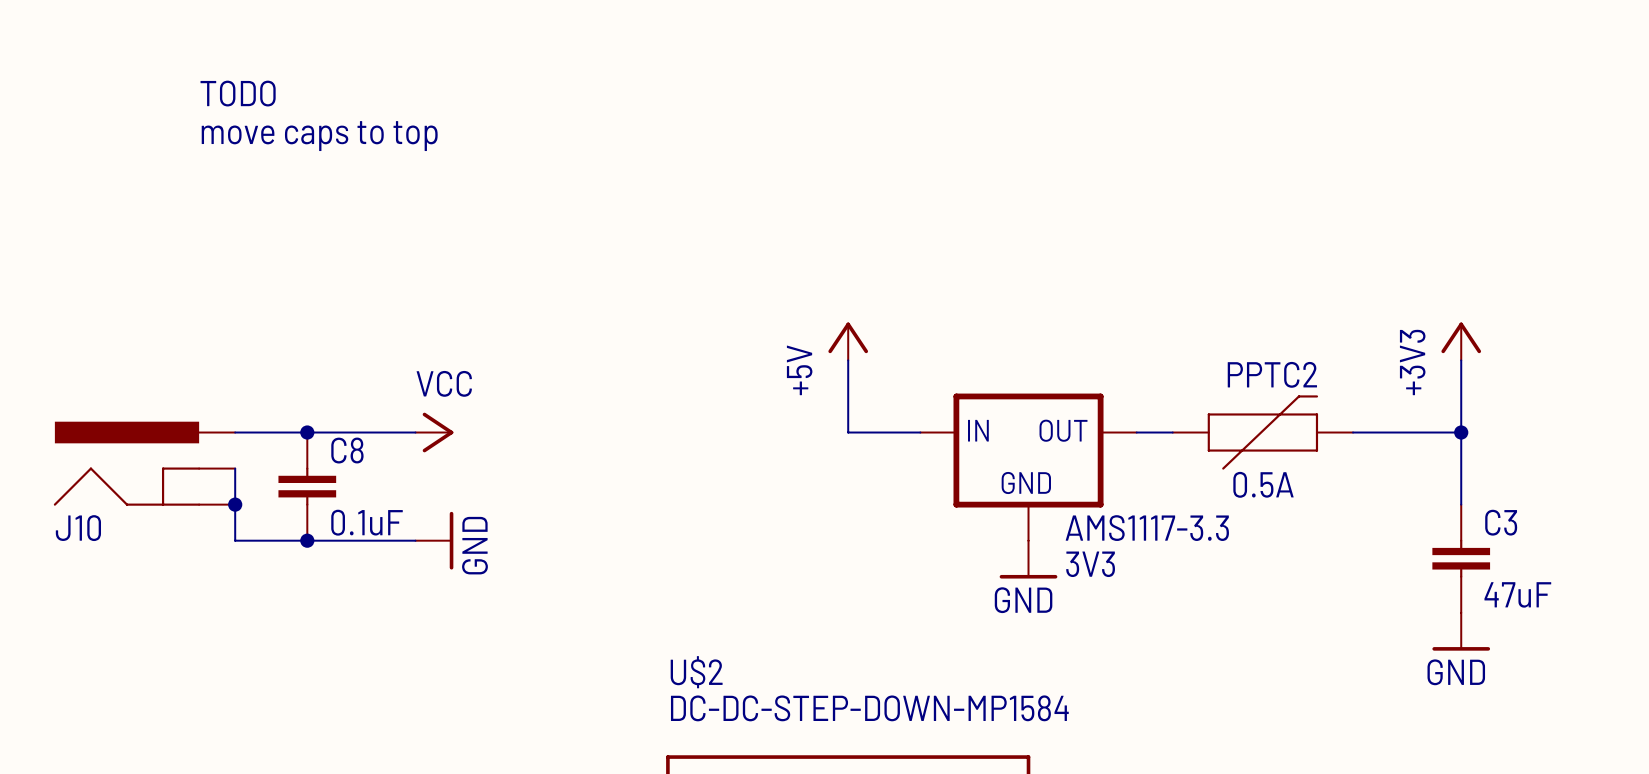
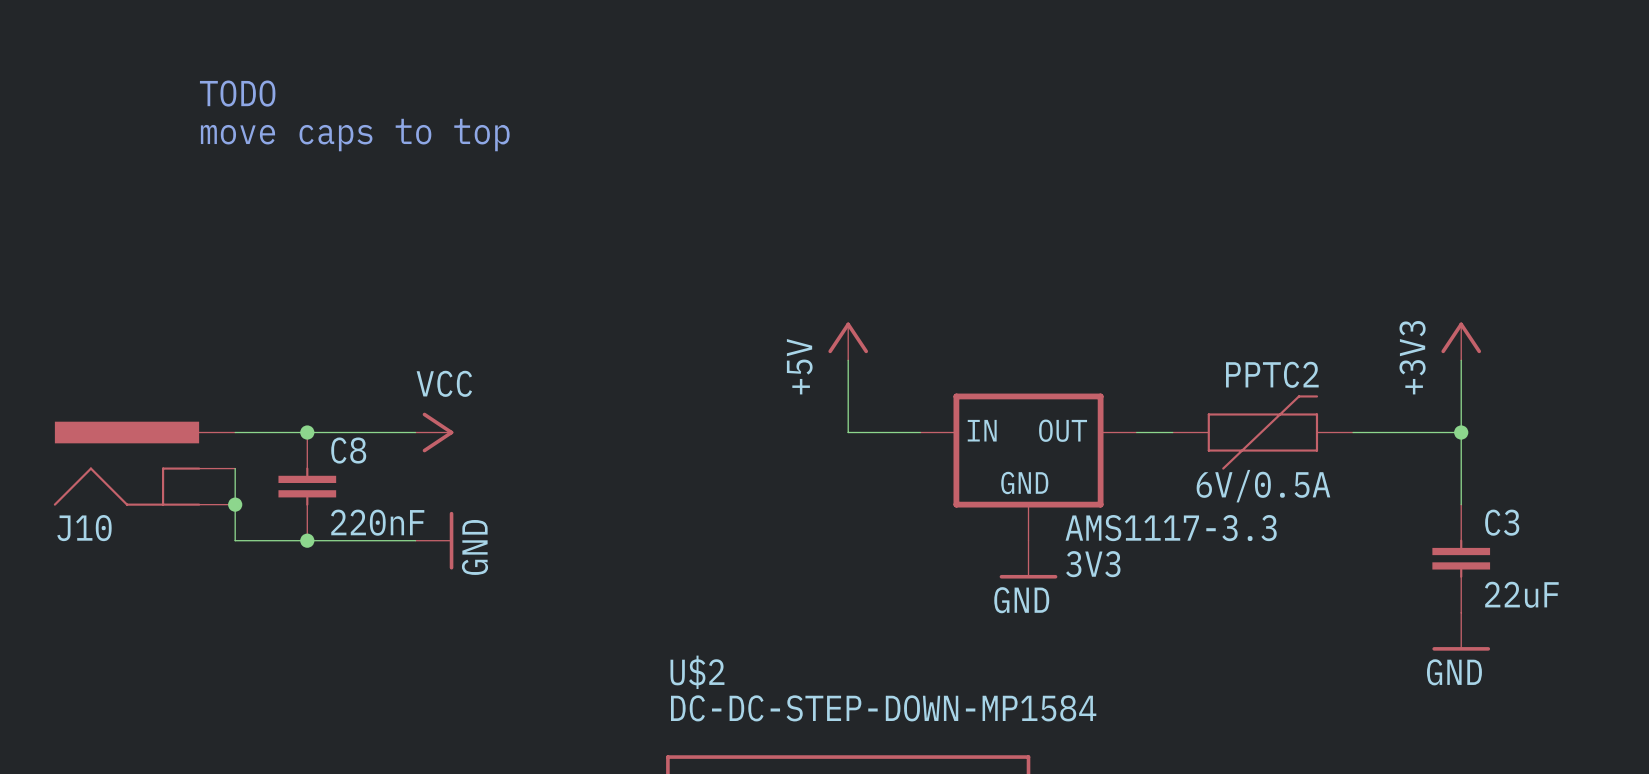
PPTC2 value: 0.5A (1263, 484) -> 6V/0.5A (1263, 486)
C8 value: 0.1uF (367, 522) -> 220nF (377, 522)
C3 value: 47uF (1517, 594) -> 22uF (1521, 594)

